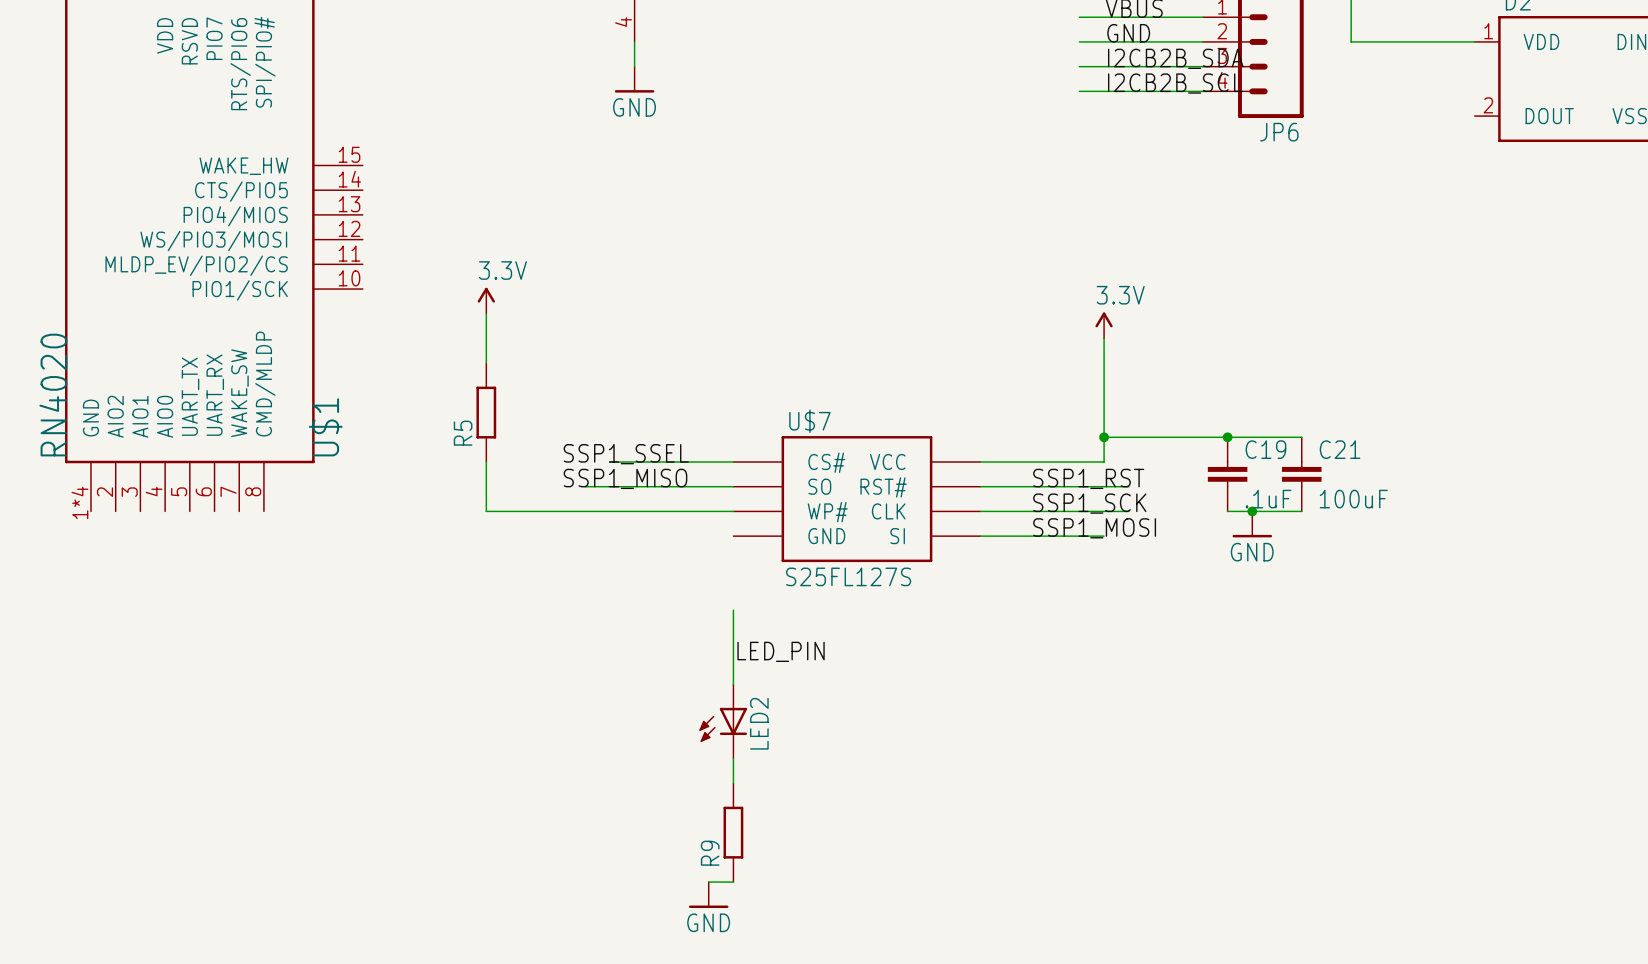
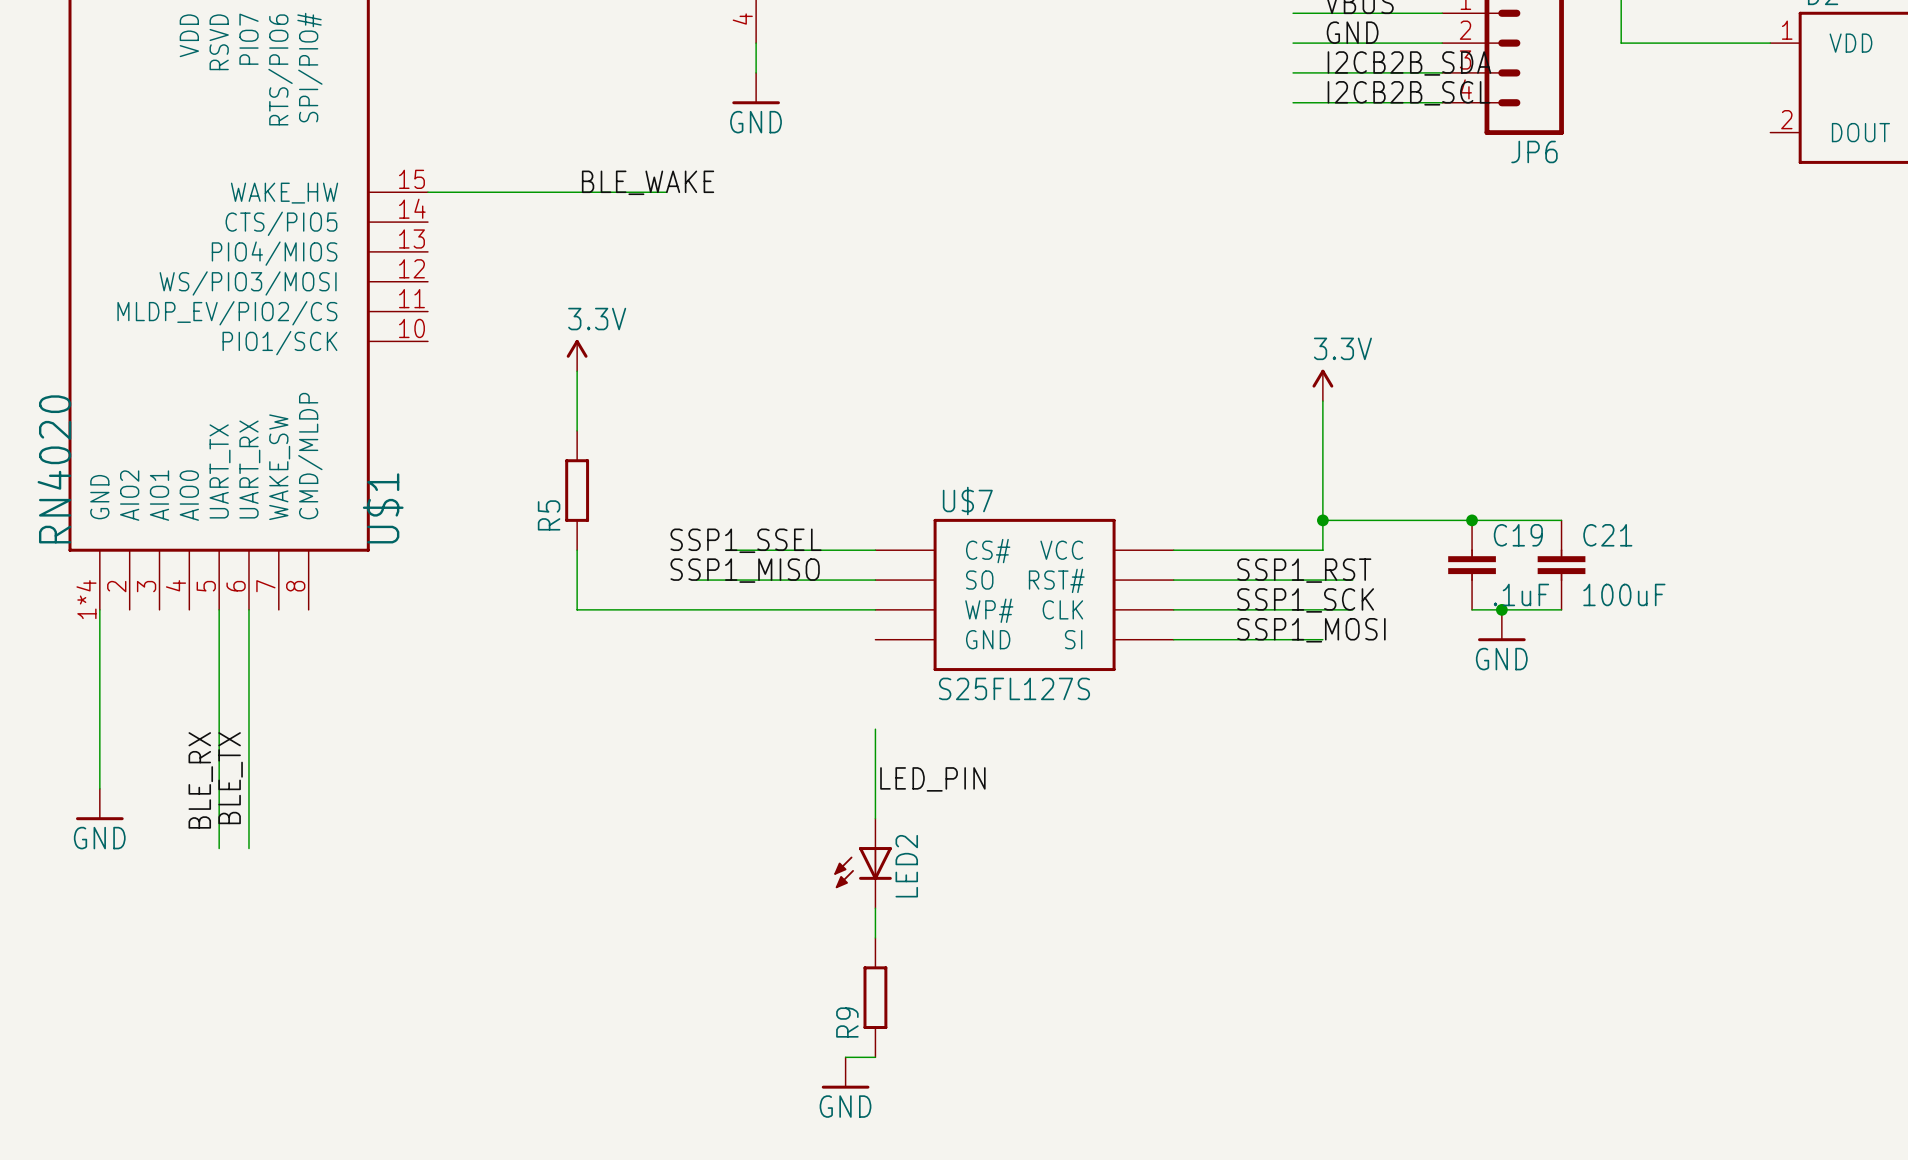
label: none -> BLE_WAKE (648, 182)
wire: none -> (427, 192) (666, 192)
wire: none -> (99, 609) (99, 788)
wire: none -> (219, 609) (219, 848)
wire: none -> (248, 609) (248, 848)
label: none -> BLE_TX (230, 778)
label: none -> BLE_RX (200, 780)
power symbol: none -> GND (99, 804)

